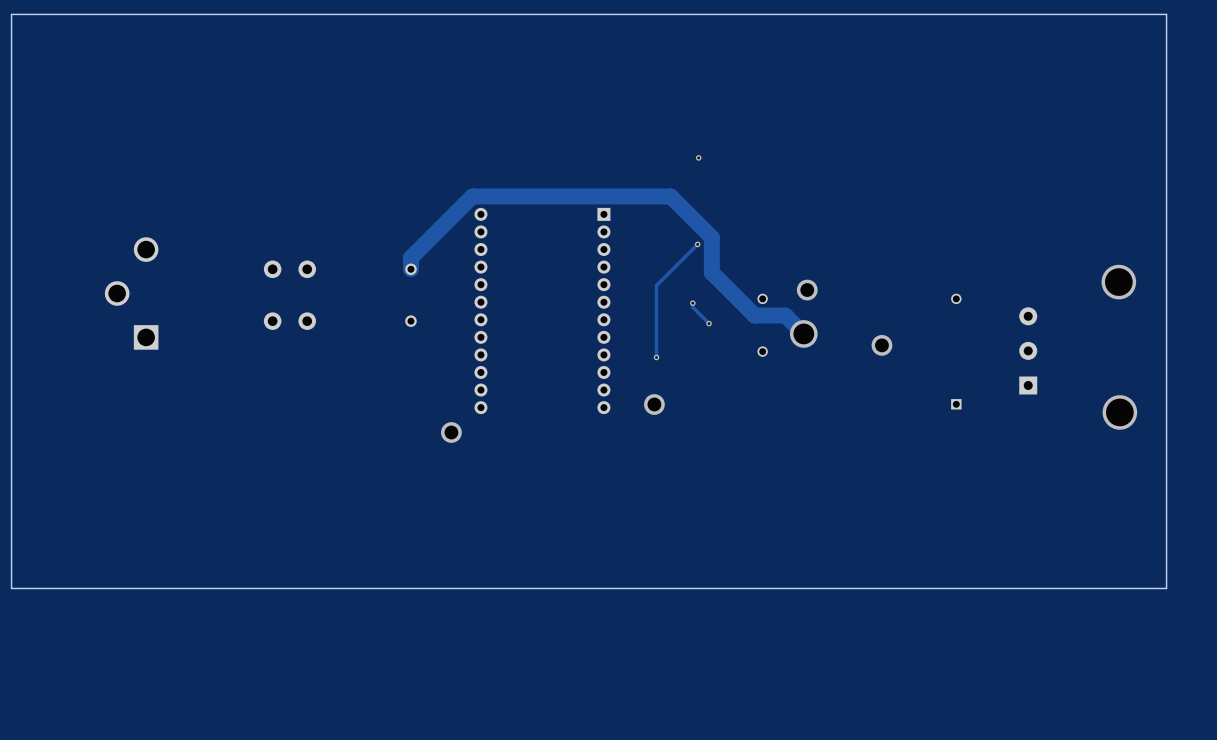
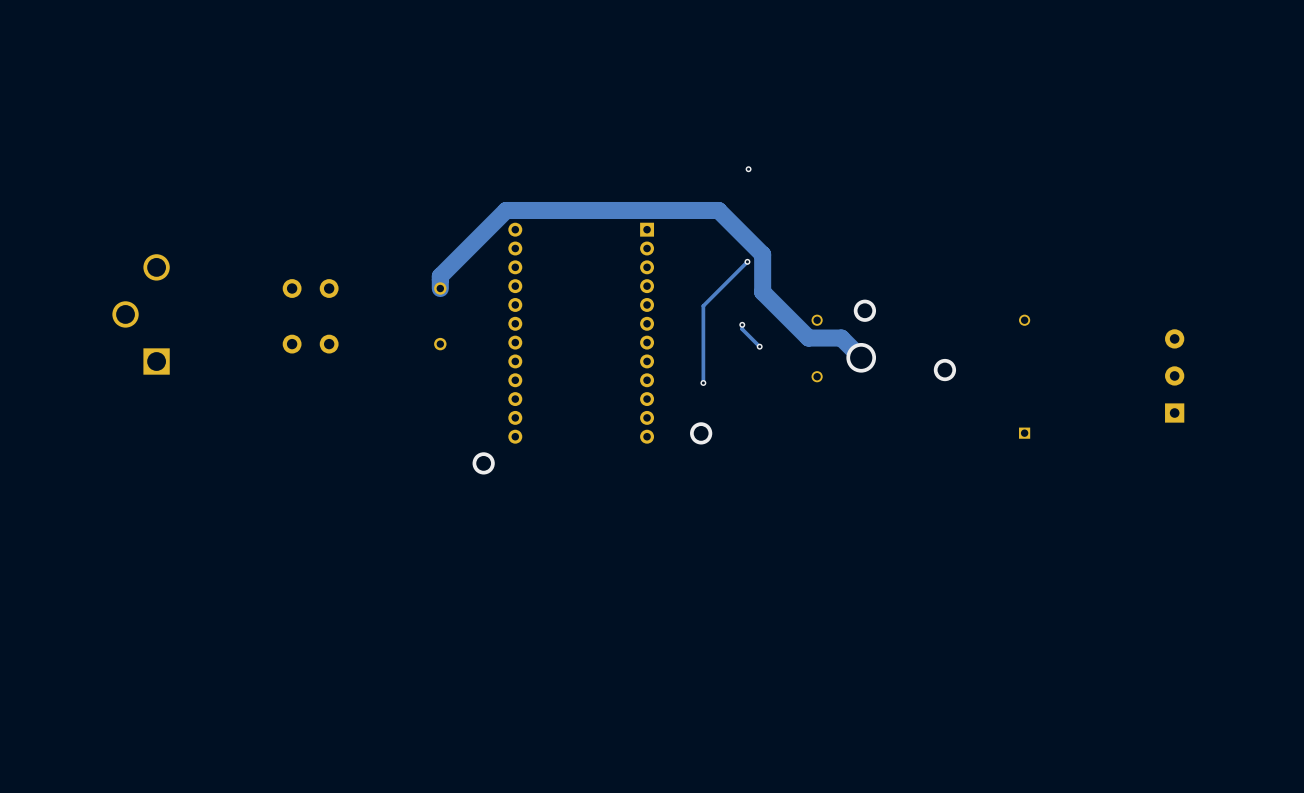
board edge: (1166, 14) (1166, 588) (11, 588) (11, 14) (1166, 14) -> none
via: (1118, 282) -> none
part position: (1028, 350) -> (1174, 375)
via: (1119, 412) -> none

